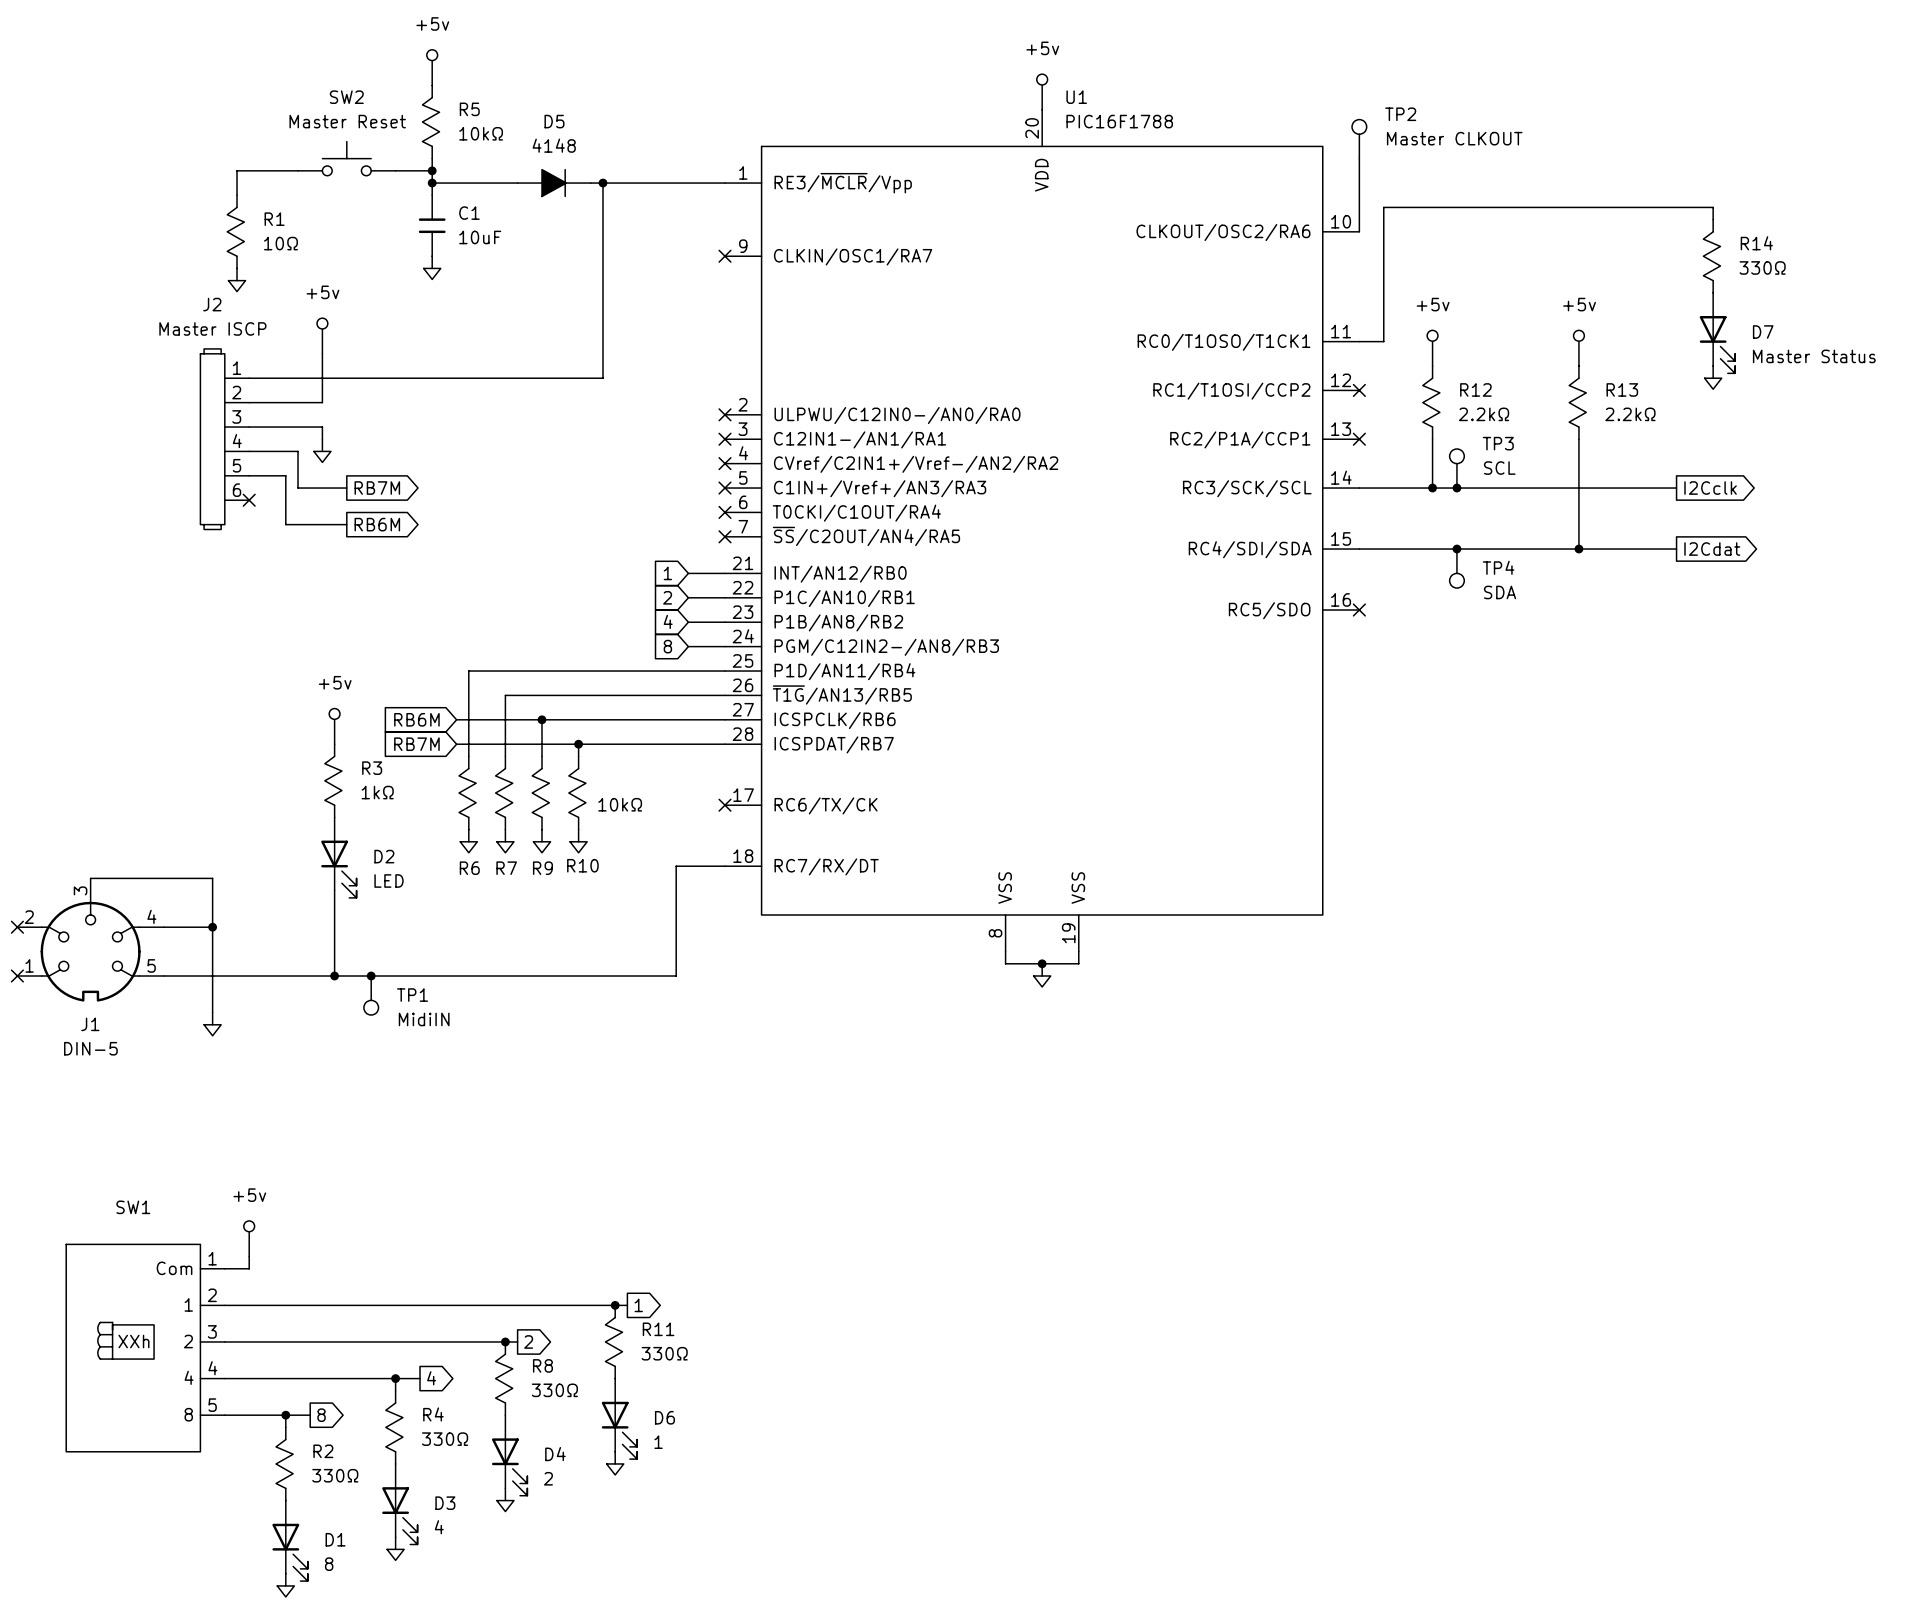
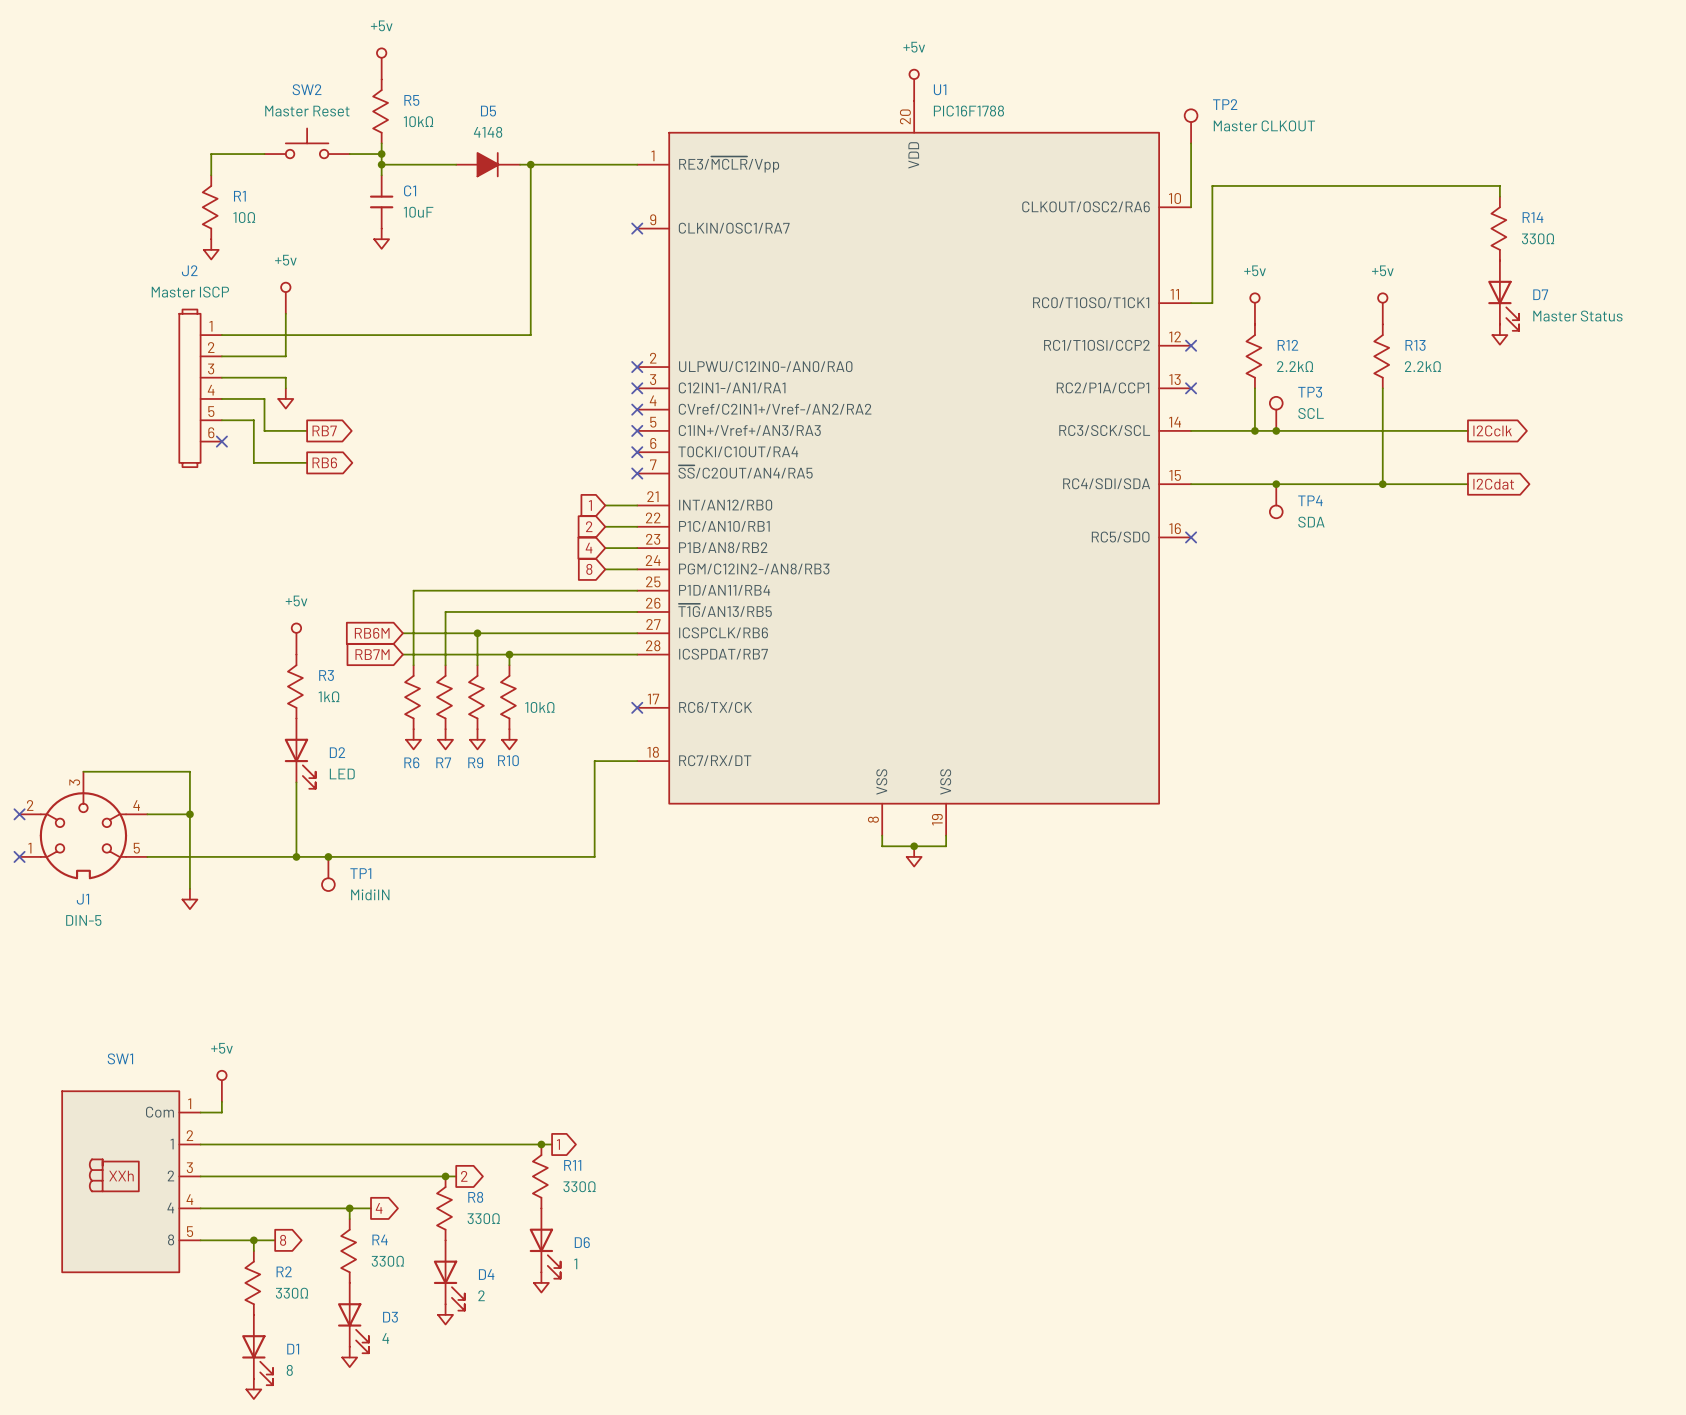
global label: RB7M (377, 488) -> RB7 (324, 430)
global label: RB6M (377, 524) -> RB6 (324, 462)

